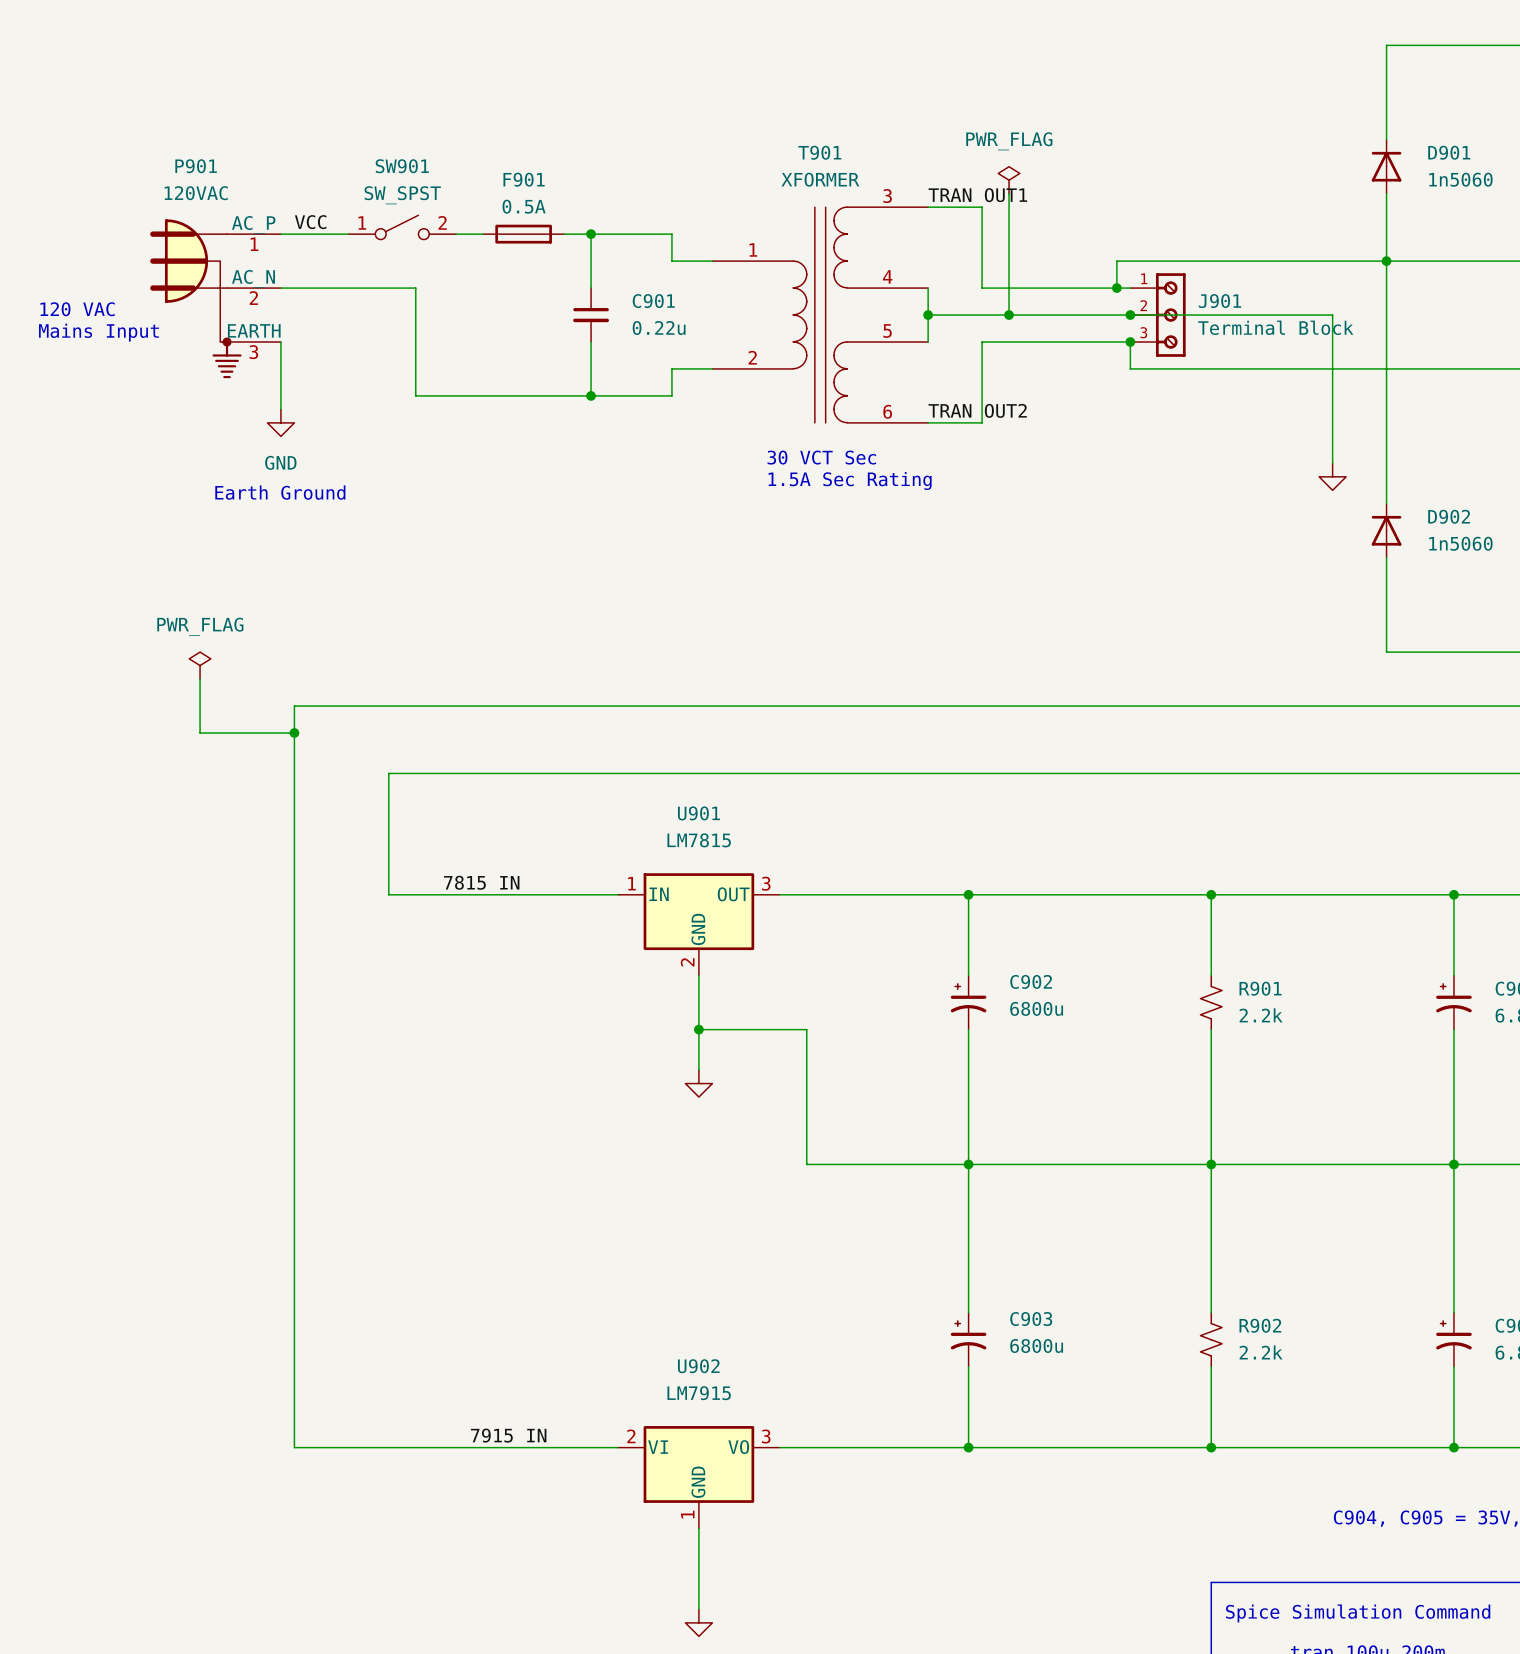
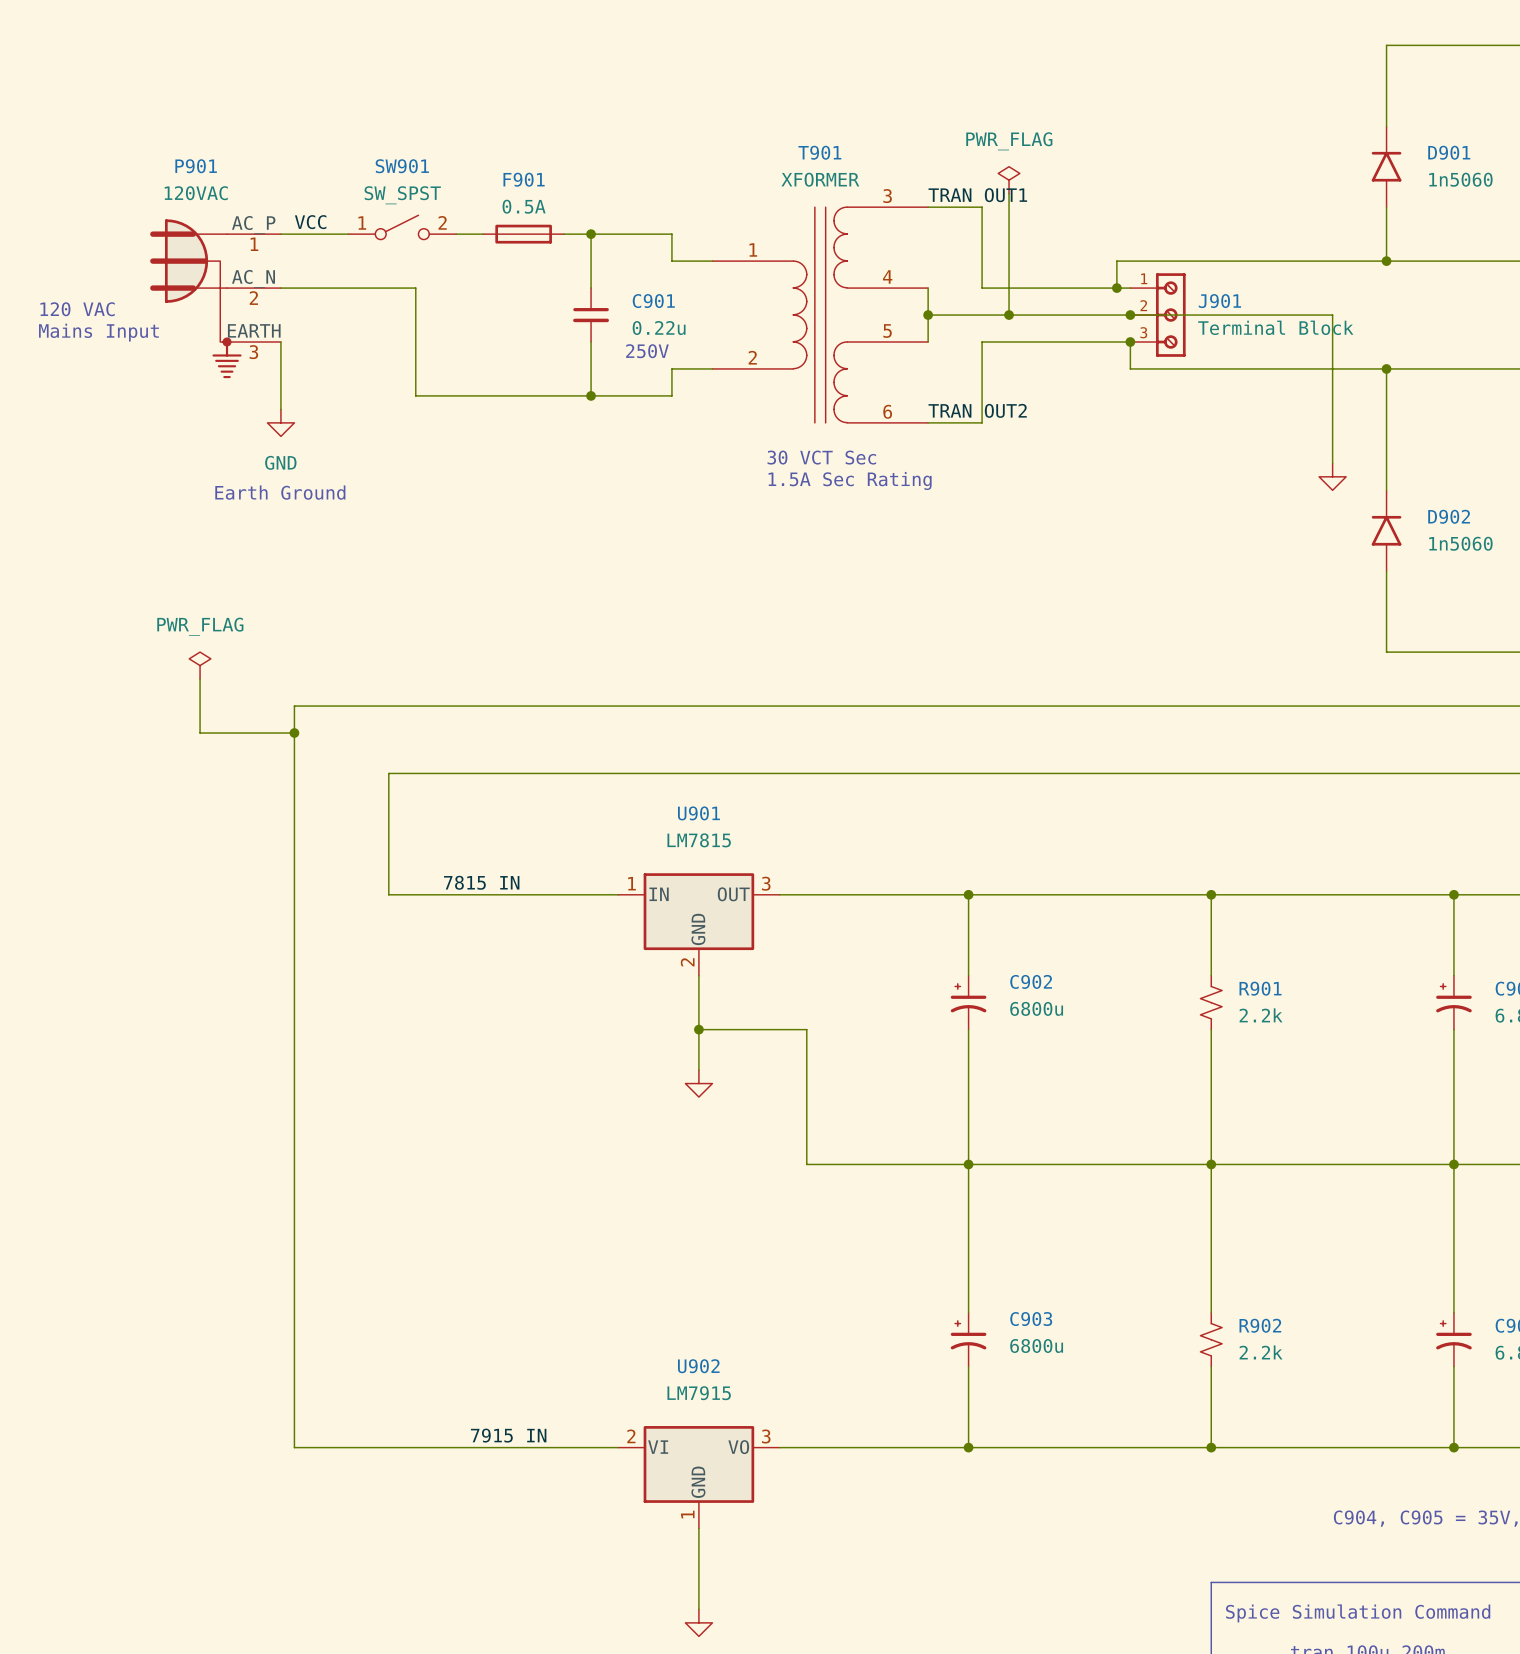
D901 symbol: [1371, 139, 1402, 194] -> [1371, 126, 1402, 208]
wire: (1386, 261) (1386, 368) -> none
text: none -> 250V (647, 351)
junction: none -> (1386, 368)
D902 symbol: [1371, 503, 1402, 558] -> [1371, 490, 1402, 572]

